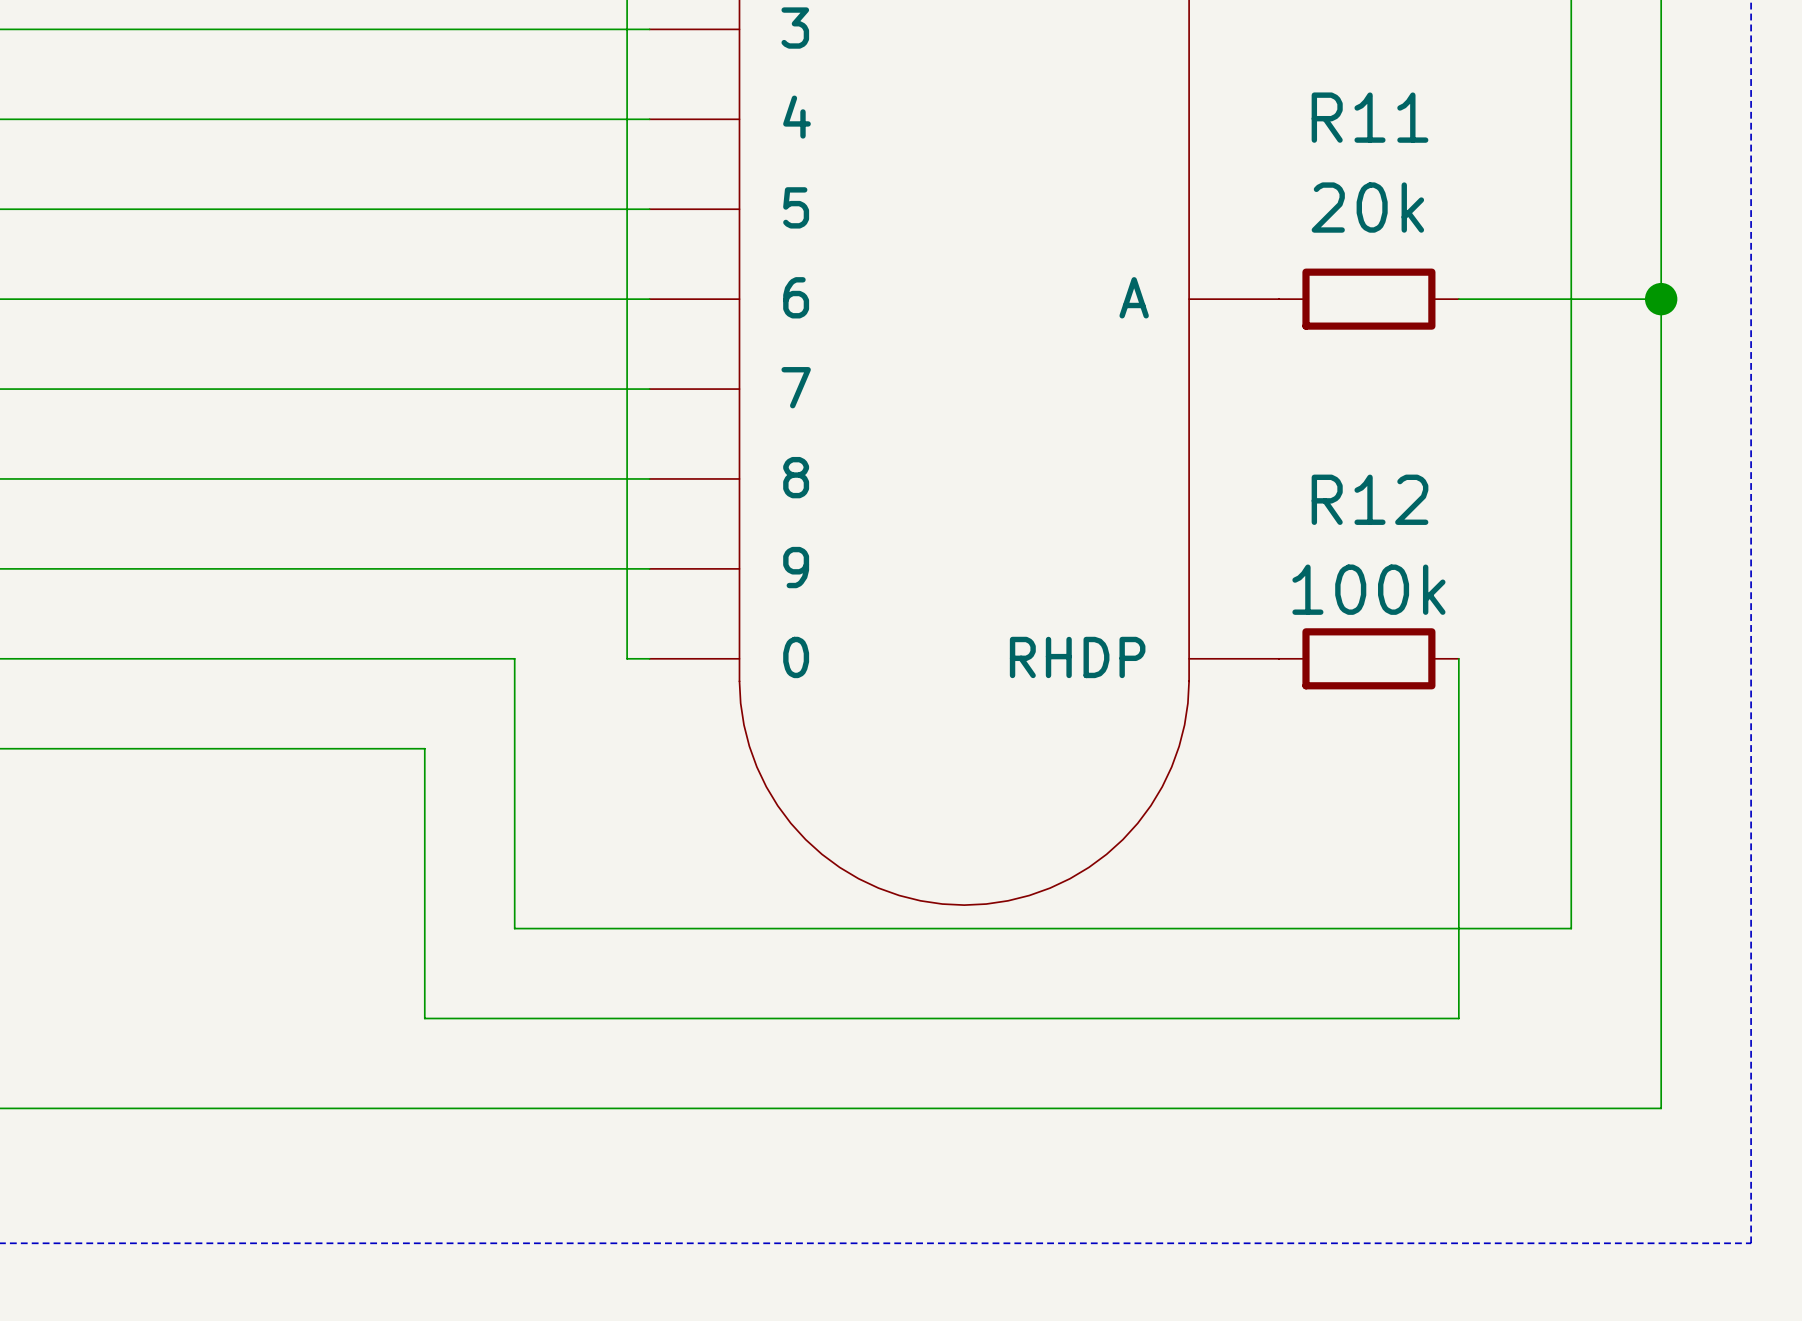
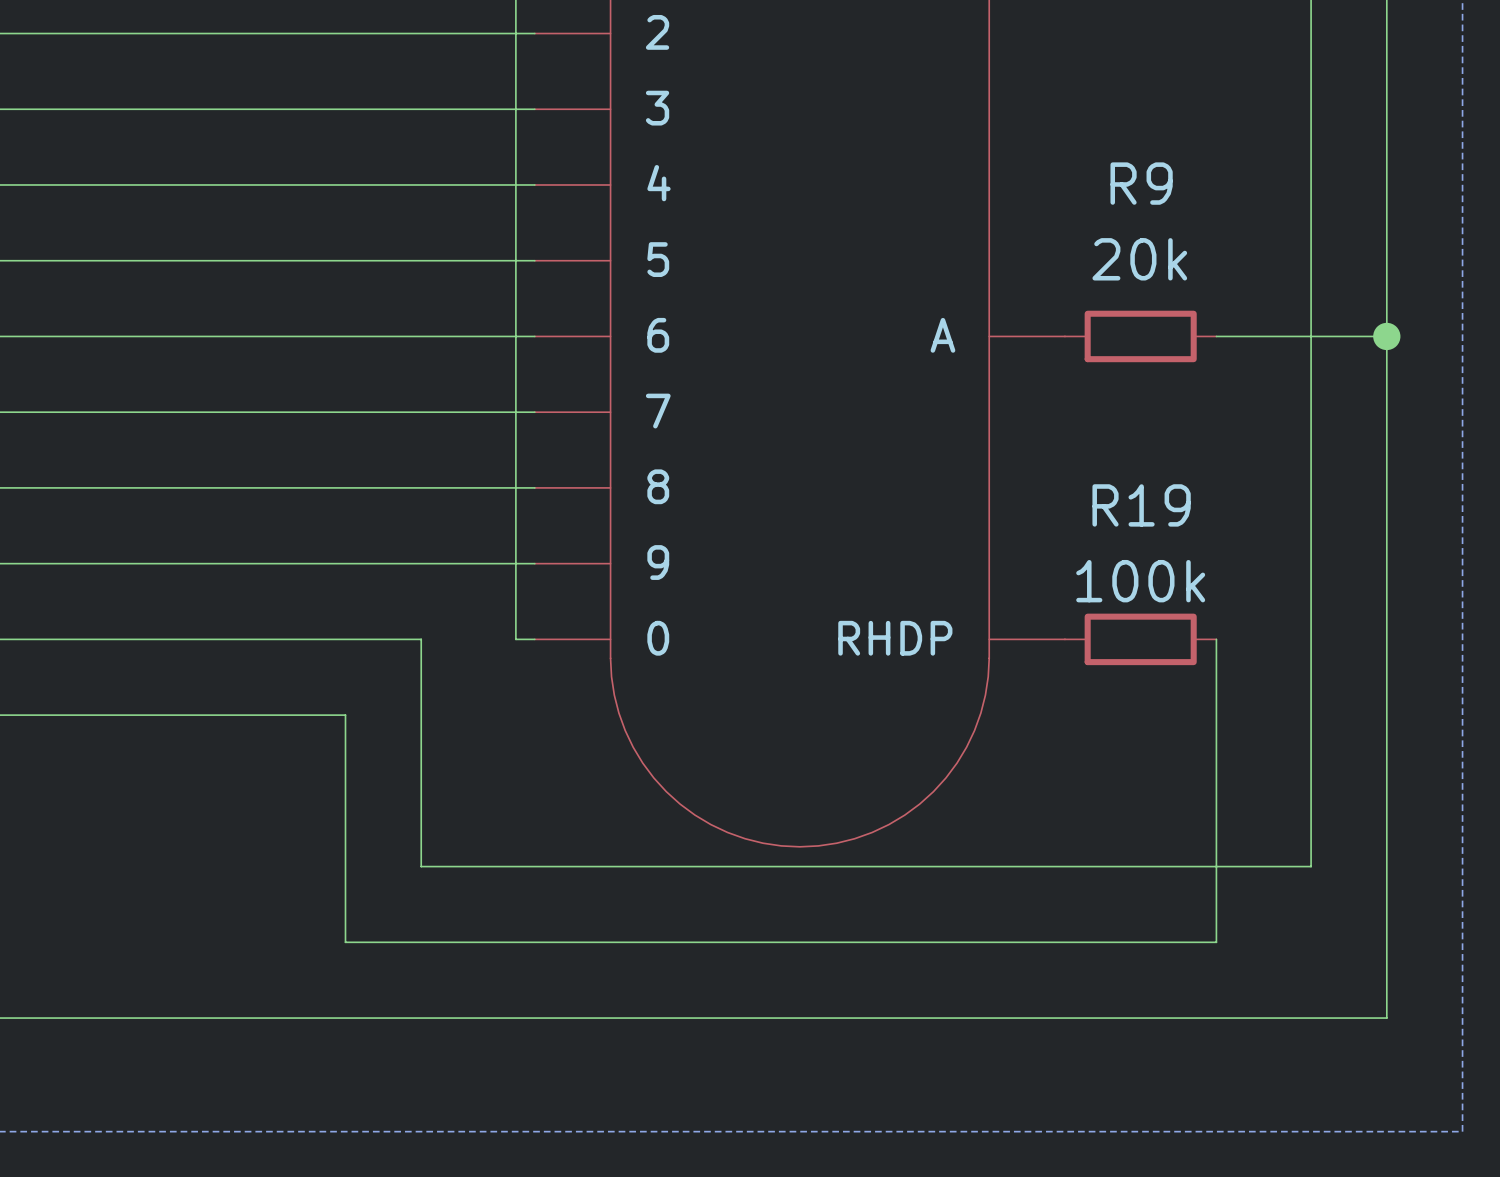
R11 name: R11 (1370, 117) -> R9 (1141, 183)
R12 name: R12 (1370, 499) -> R19 (1141, 505)

